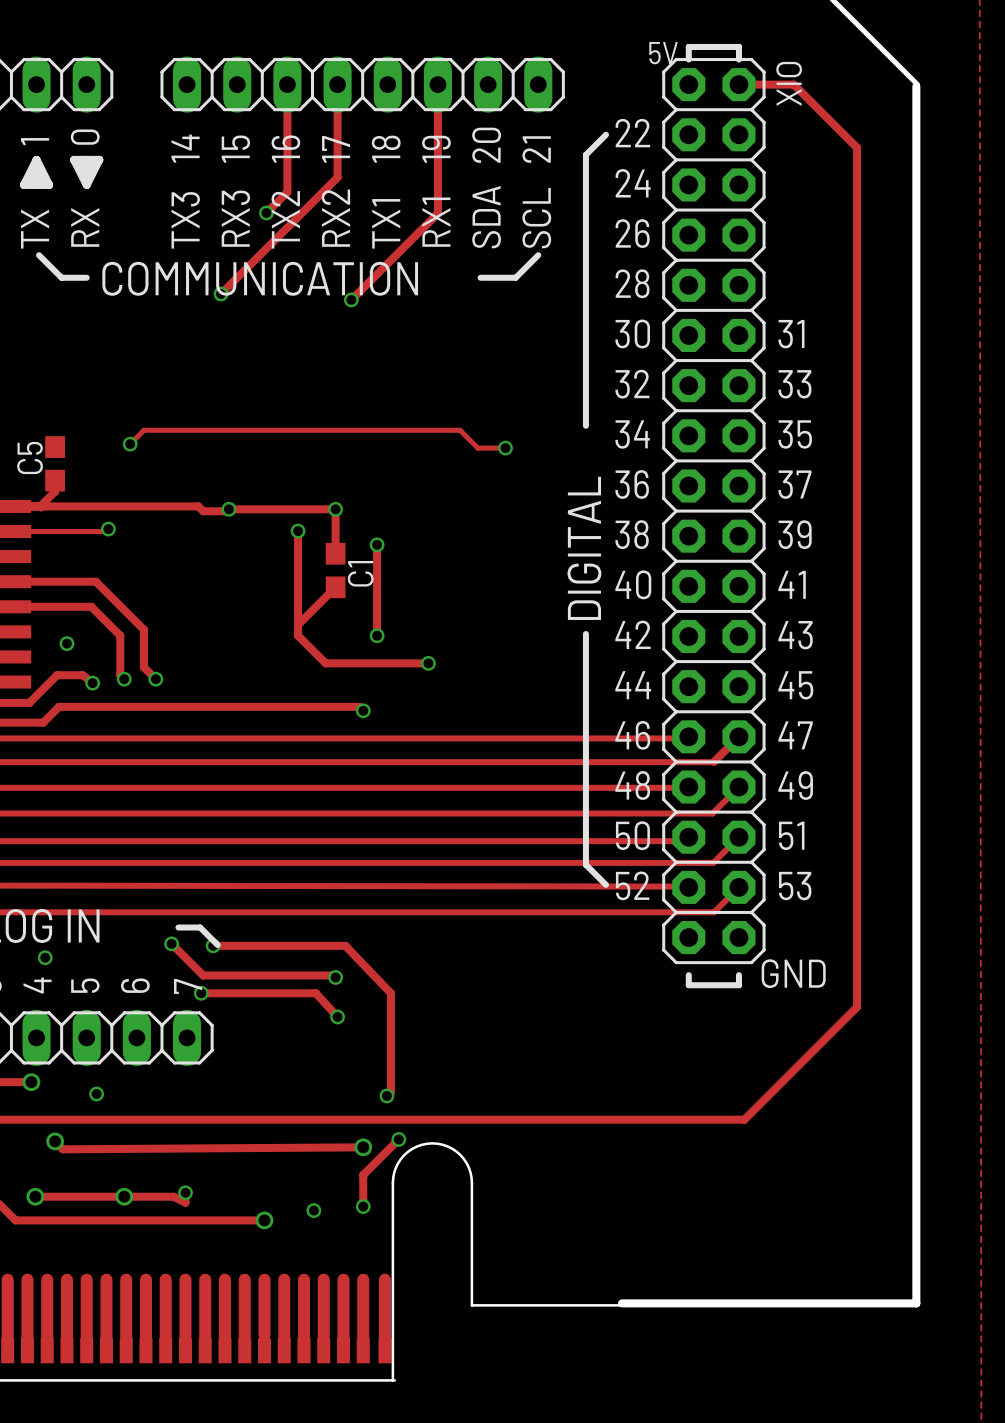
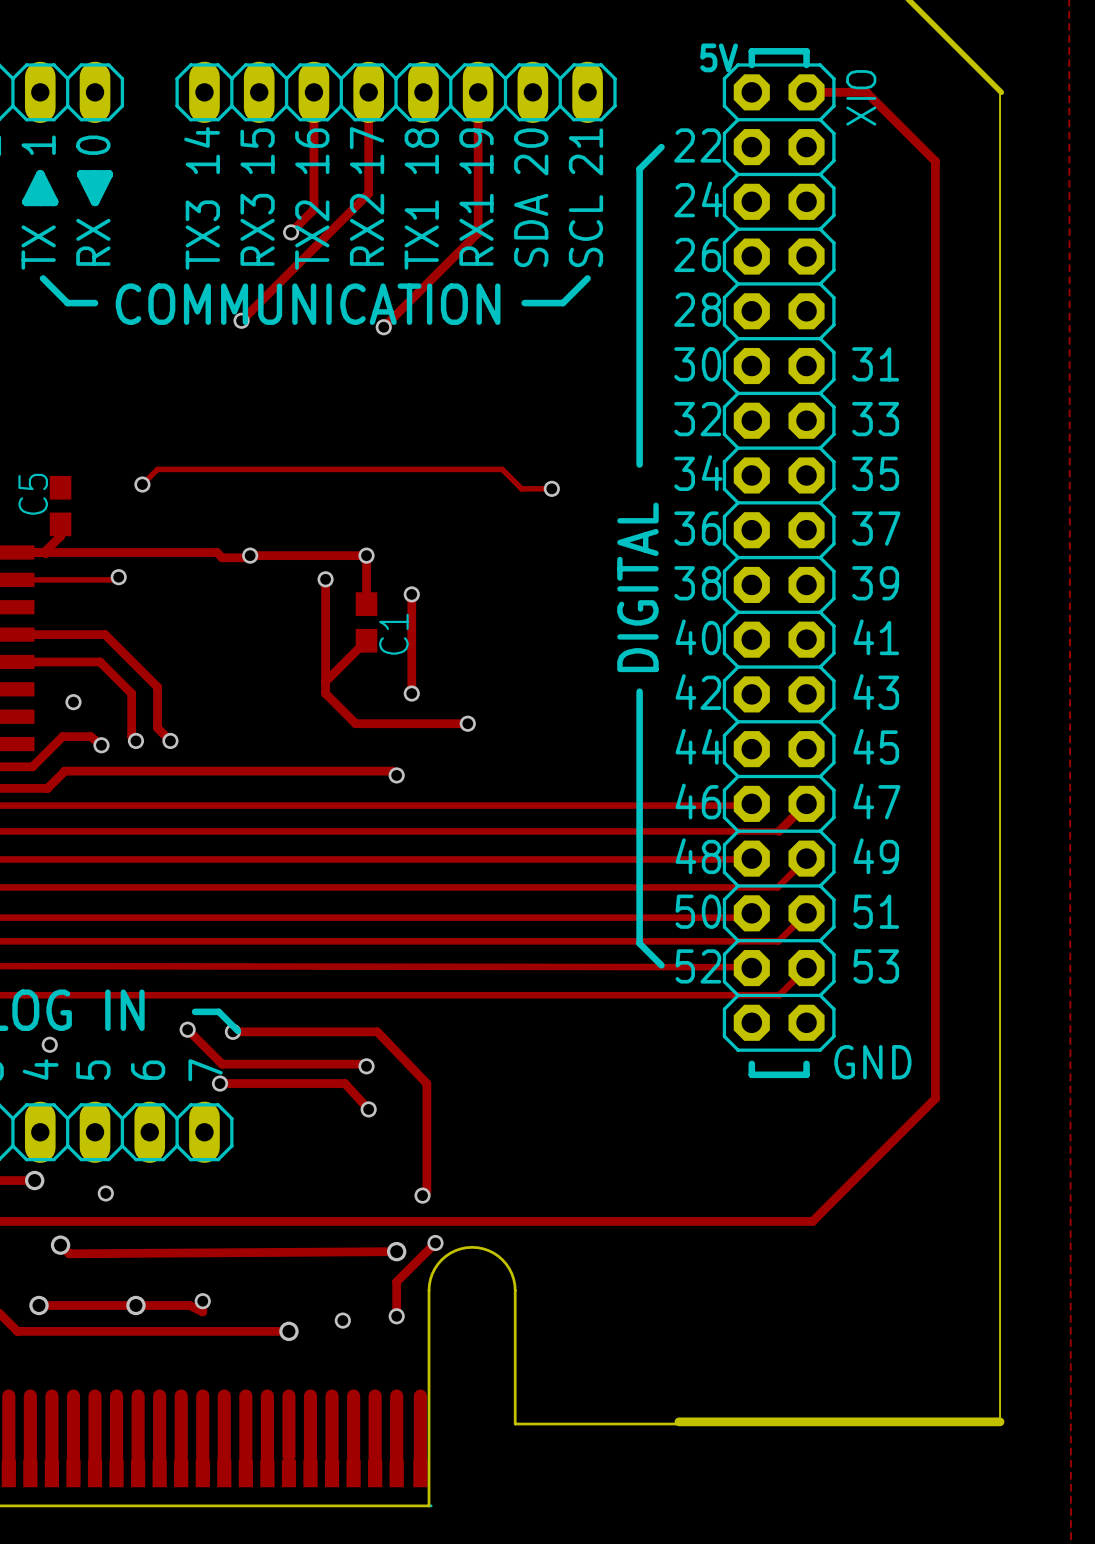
board edge width: thick (916, 86) (916, 1303) -> thin (1000, 94) (1000, 1421)

